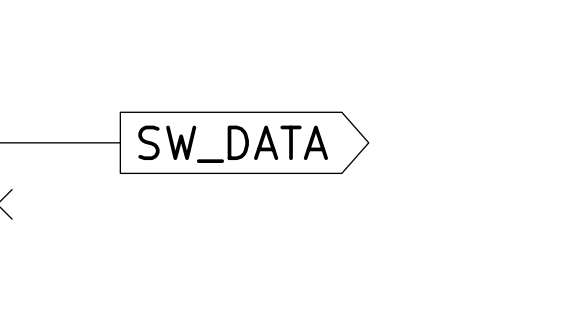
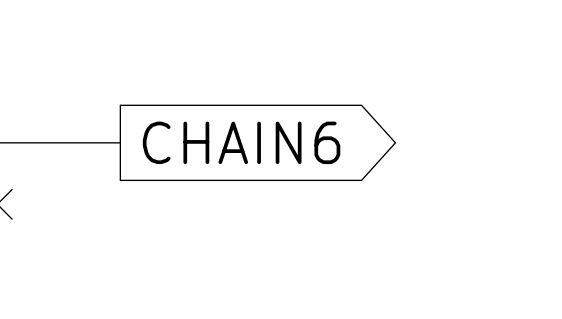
global label: SW_DATA (233, 144) -> CHAIN6 (241, 142)

